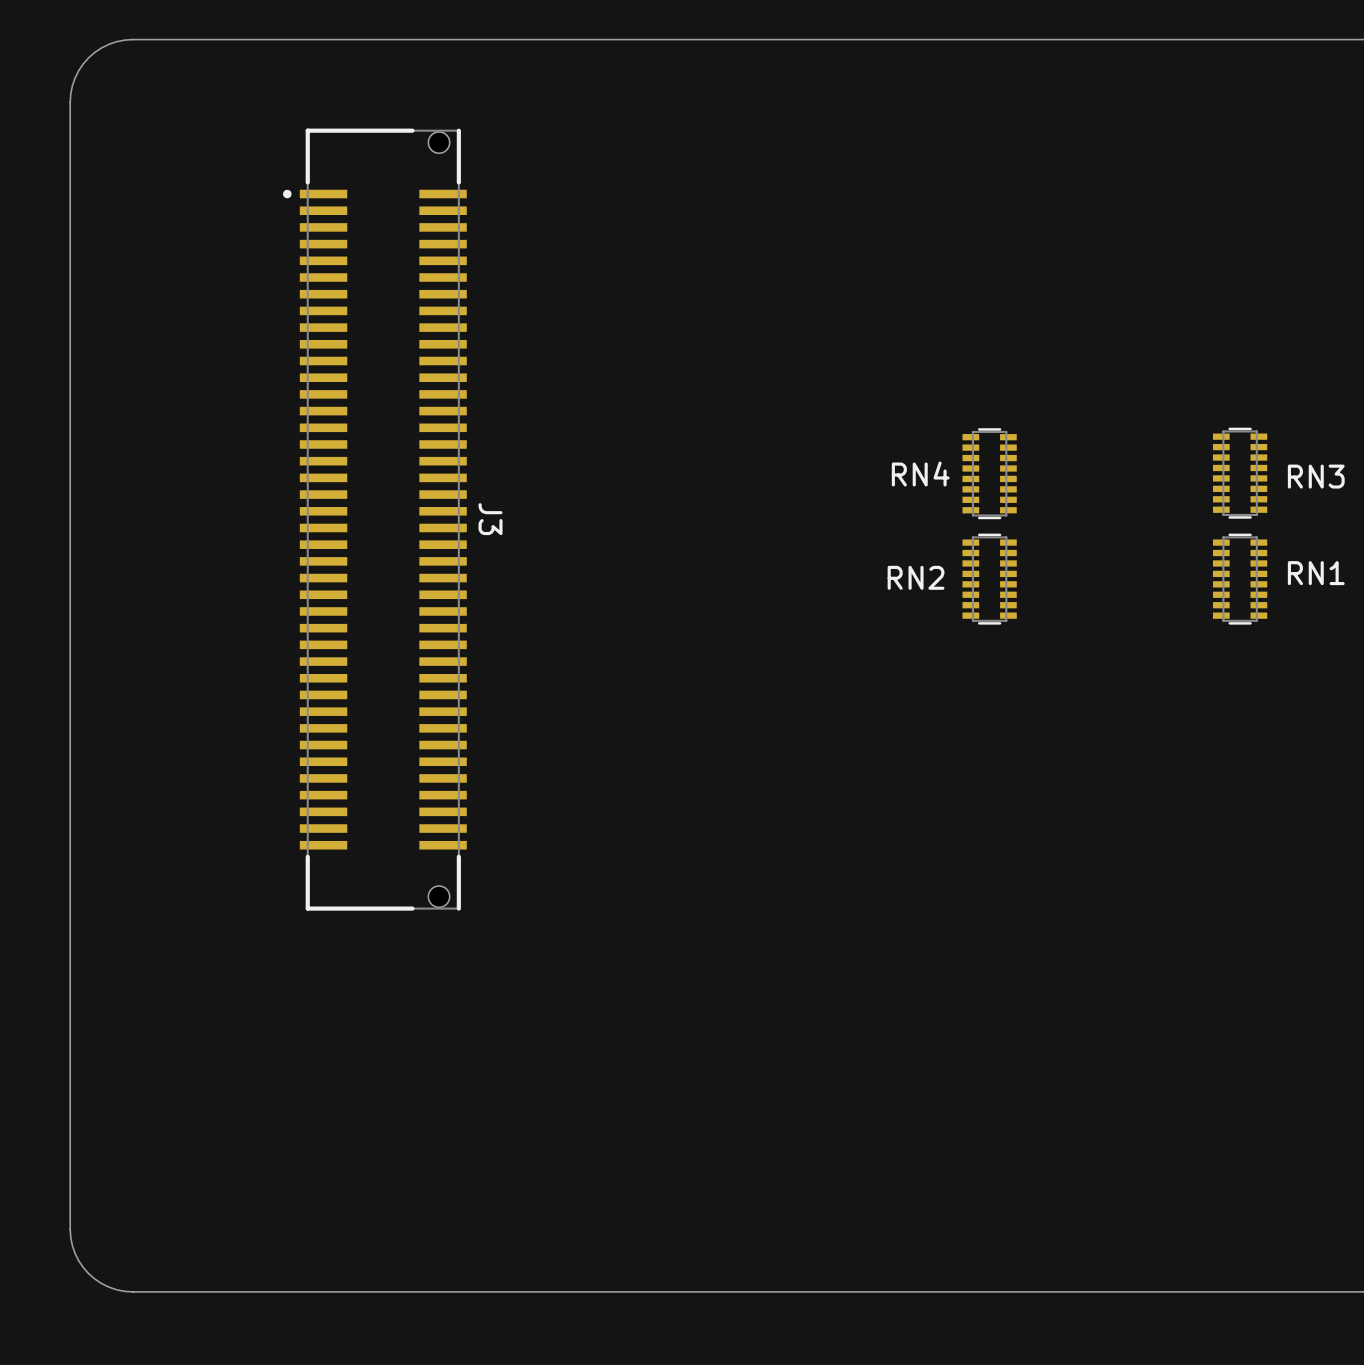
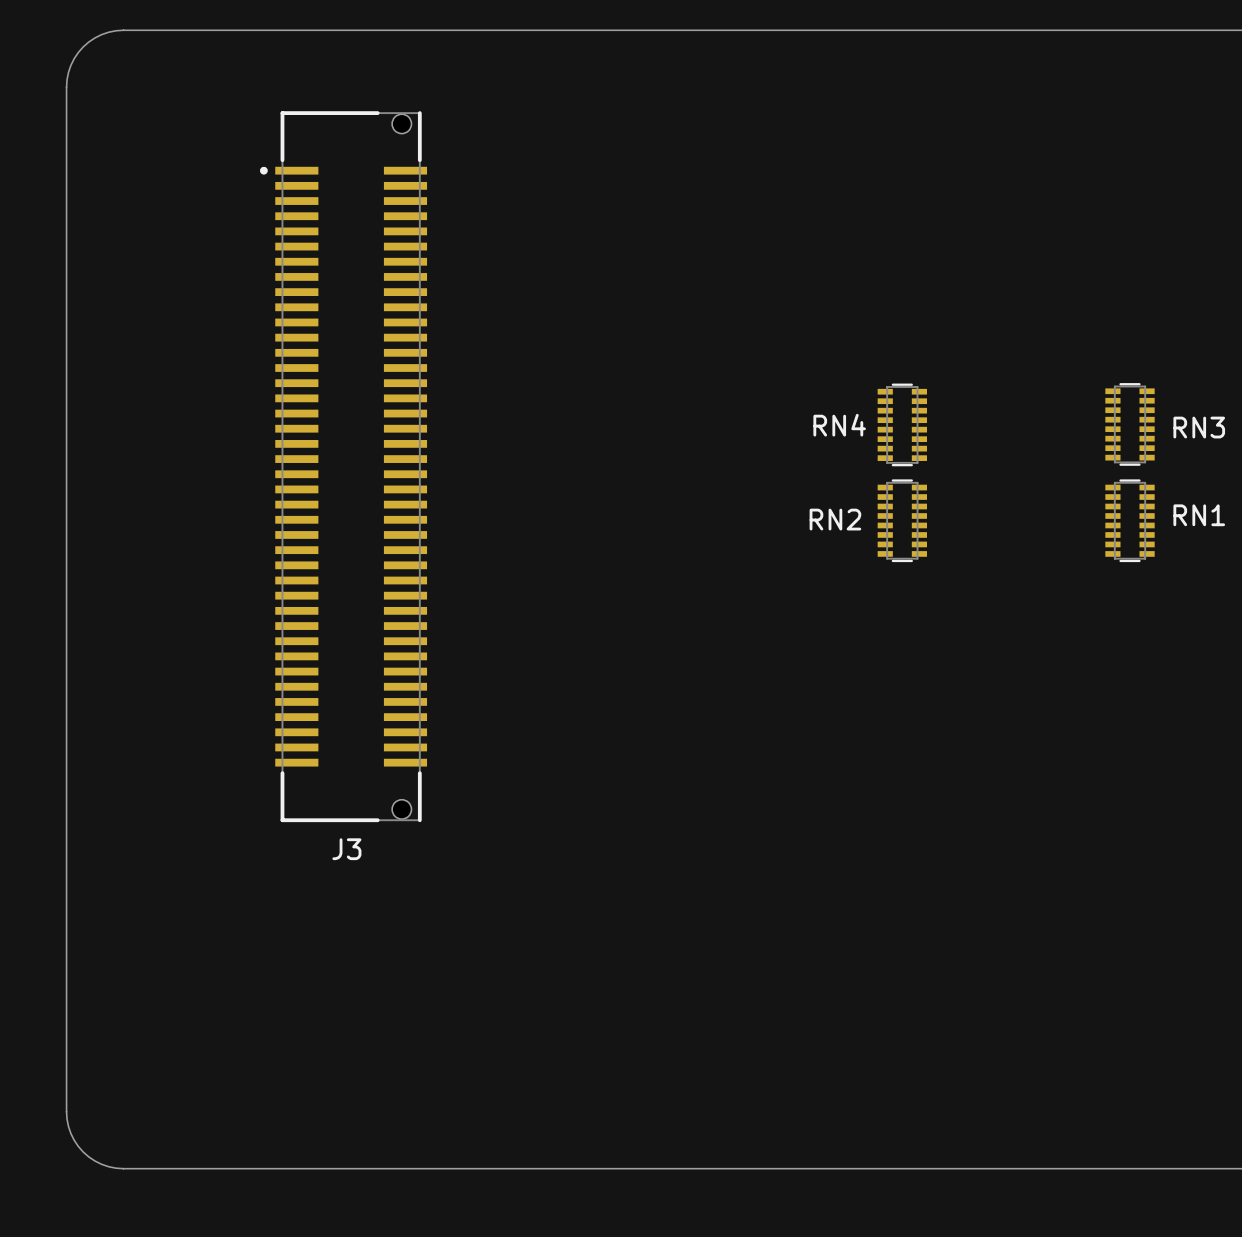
J3 name rotation: 0° (490, 519) -> 90° counterclockwise (346, 849)
J3 name position: J3 (490, 519) -> J3 (346, 849)

